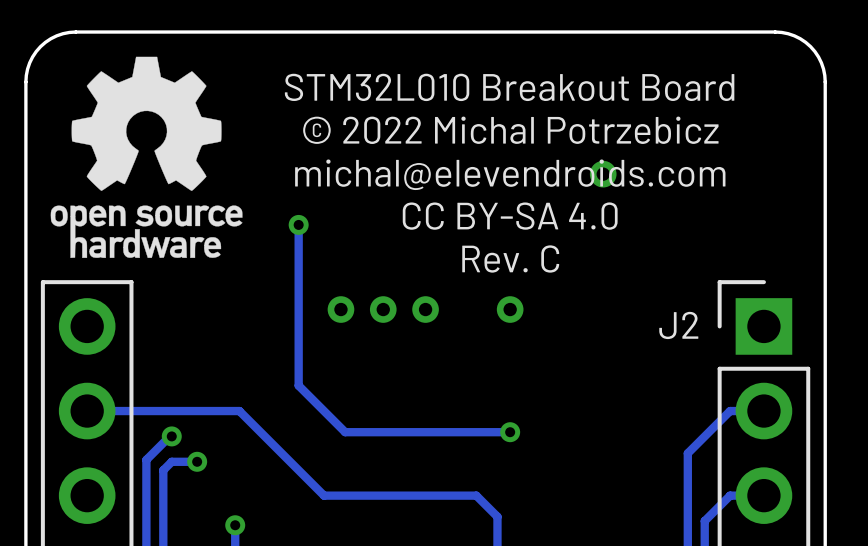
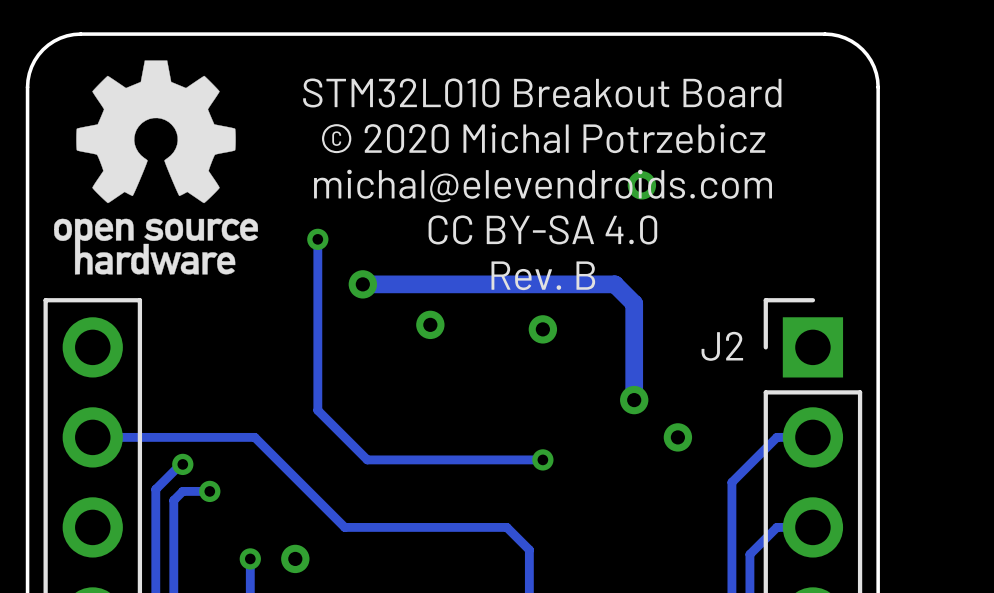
text: © 2022 Michal Potrzebicz (510, 130) -> © 2020 Michal Potrzebicz (543, 138)
text: Rev. C (510, 258) -> Rev. B (543, 275)
track: none -> (362, 284) (614, 284) (634, 303) (634, 400)
via: none -> (362, 284)
via: none -> (430, 324)
via: (340, 309) -> none
via: (383, 309) -> none
via: (425, 309) -> none
via: none -> (634, 400)
via: none -> (677, 437)
via: none -> (295, 558)

